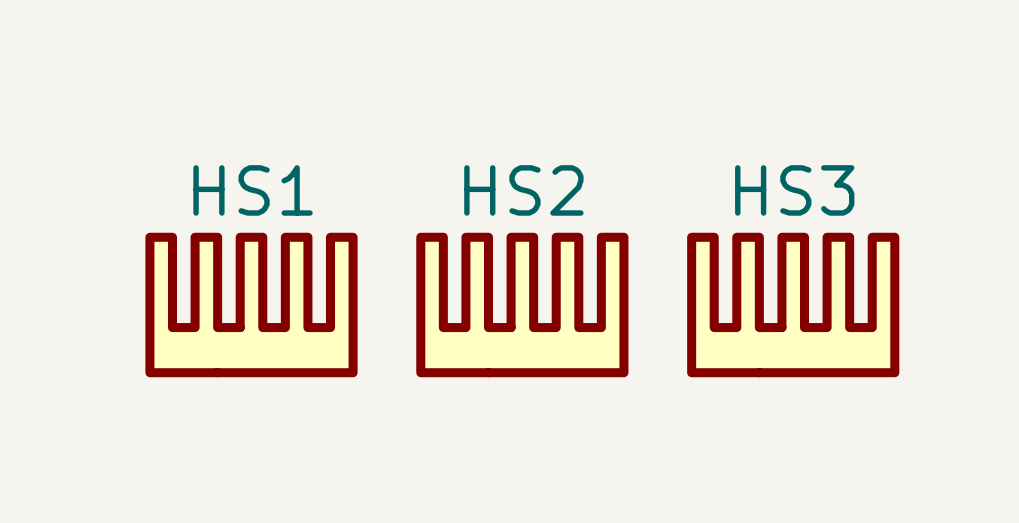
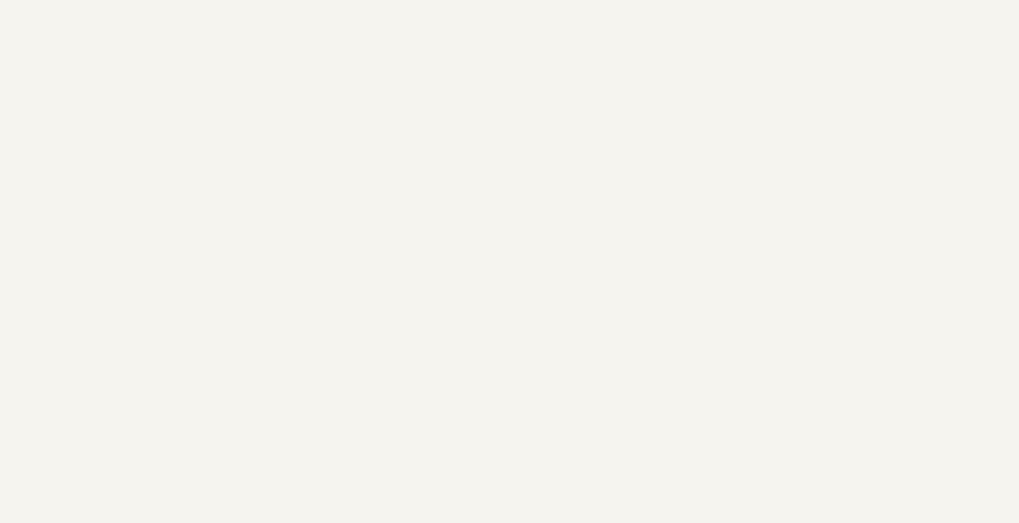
HS1: (251, 304) -> none
HS2: (522, 304) -> none
HS3: (793, 304) -> none

